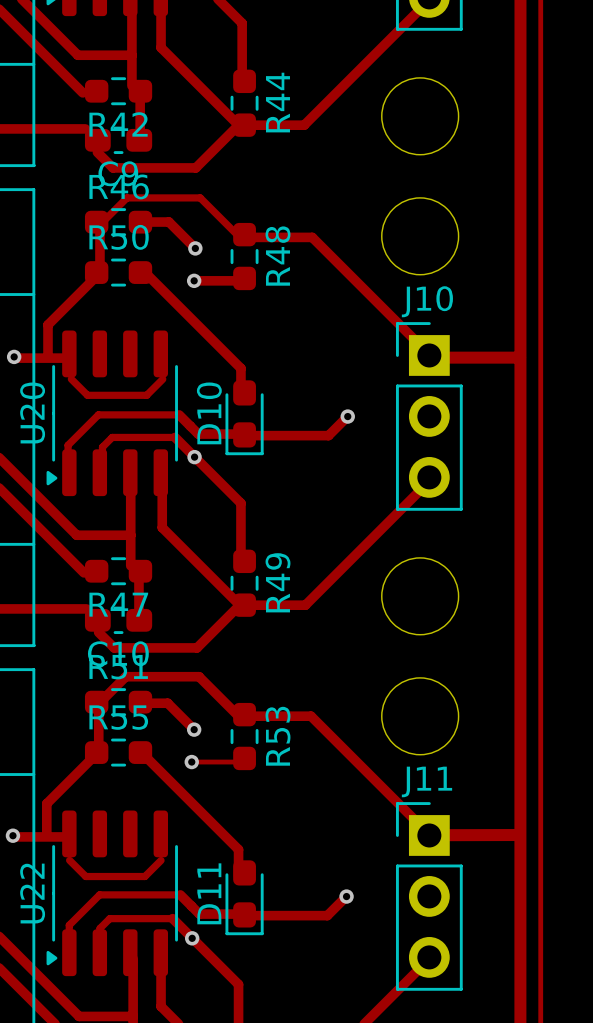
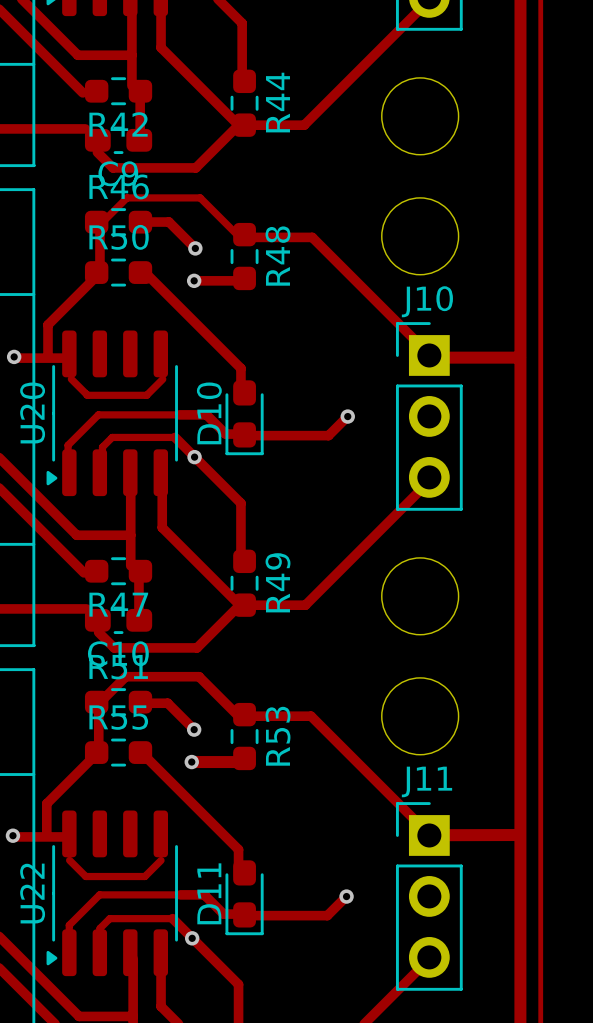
track: (179, 414) (198, 434) (225, 434) -> (179, 414) (206, 414) (225, 434)
track width: thin (191, 762) (236, 762) -> thick (191, 762) (236, 762)
track: (180, 894) (199, 914) (223, 914) -> (180, 894) (204, 894) (223, 914)

